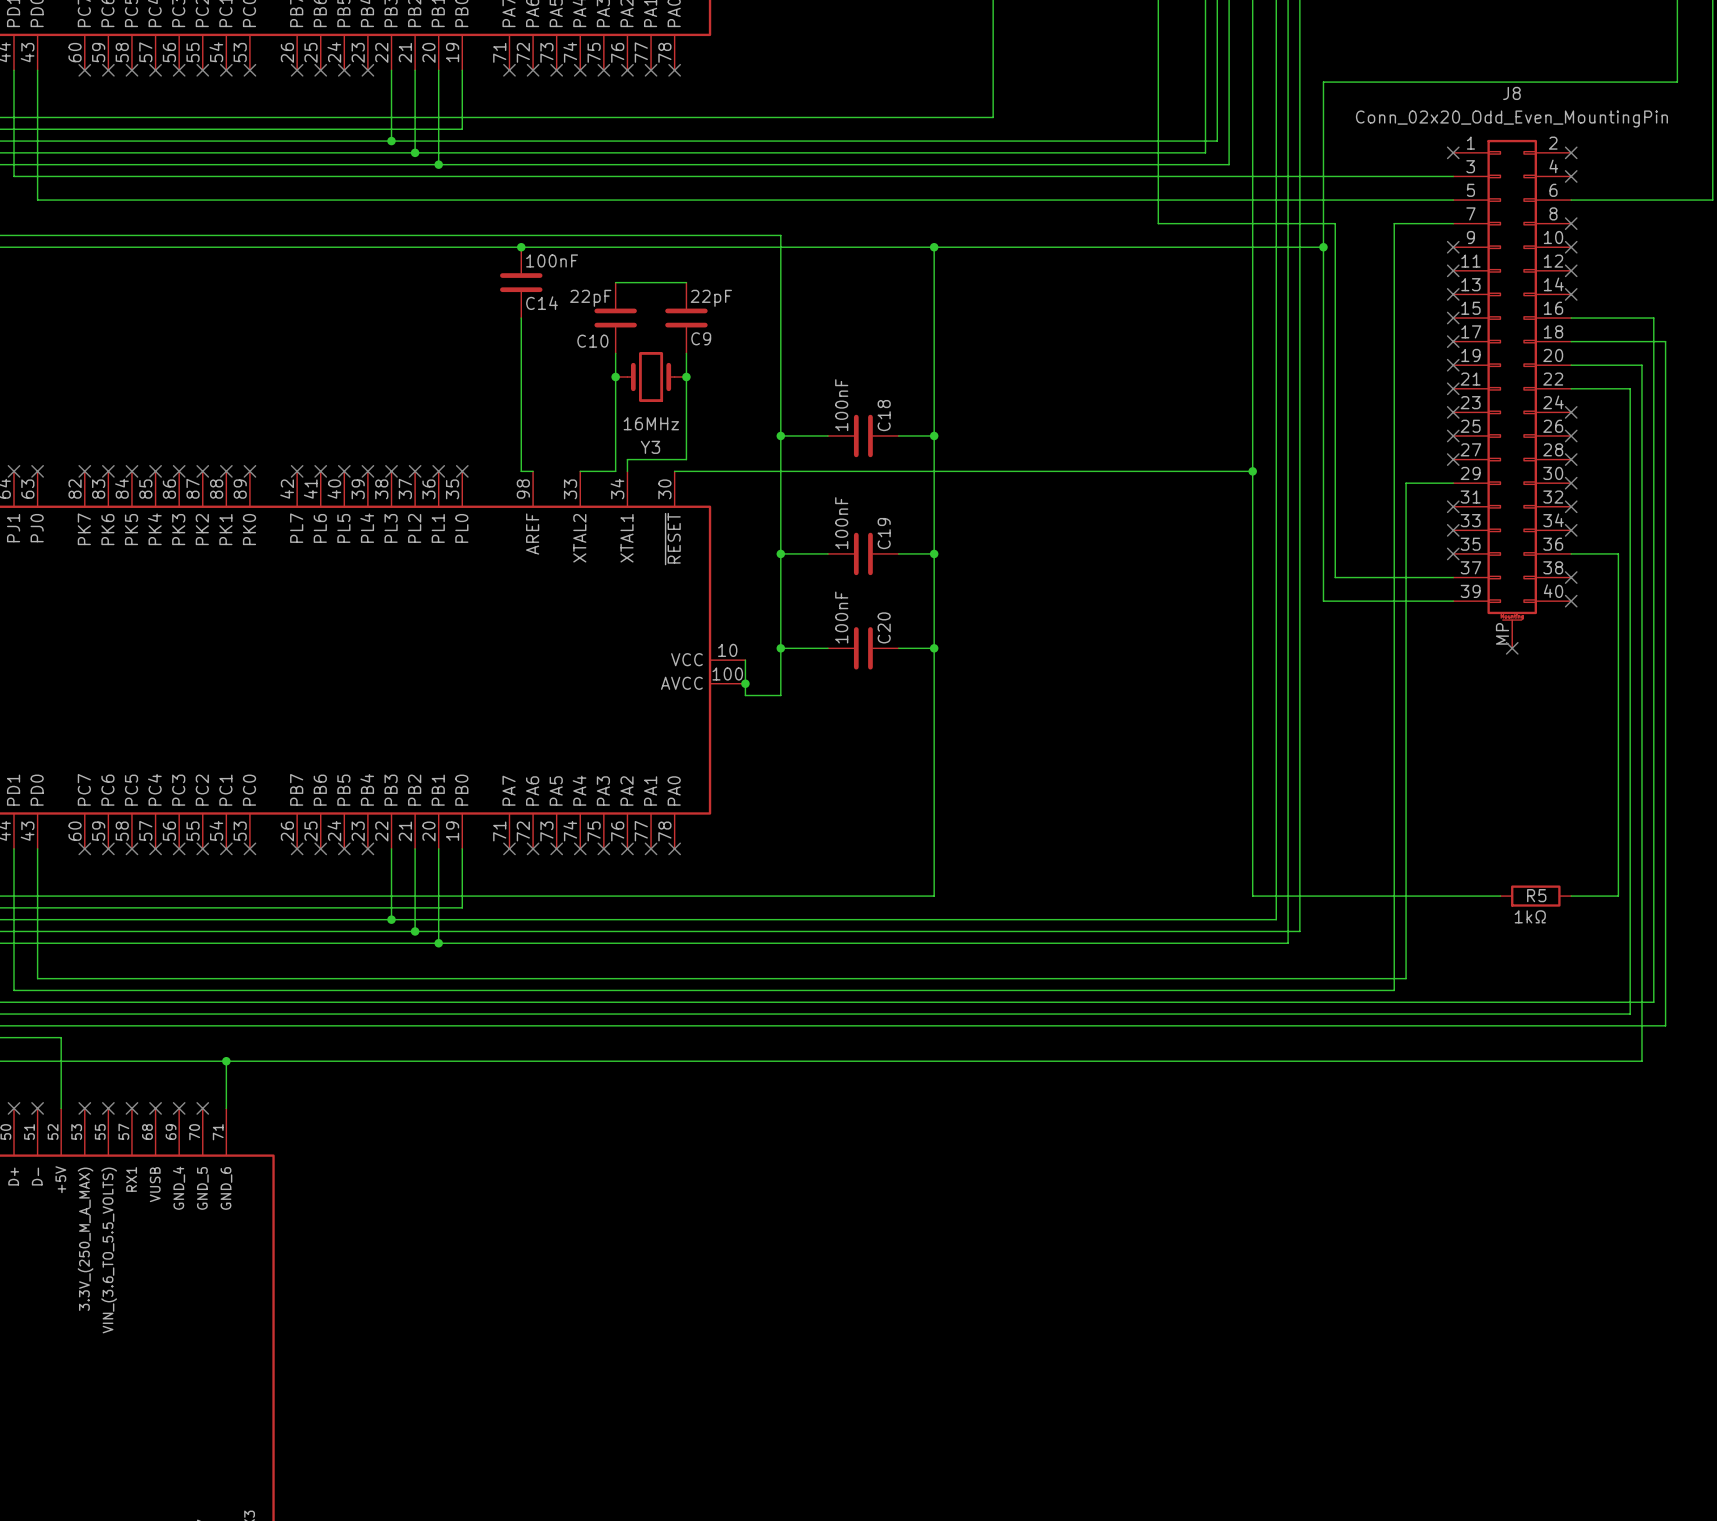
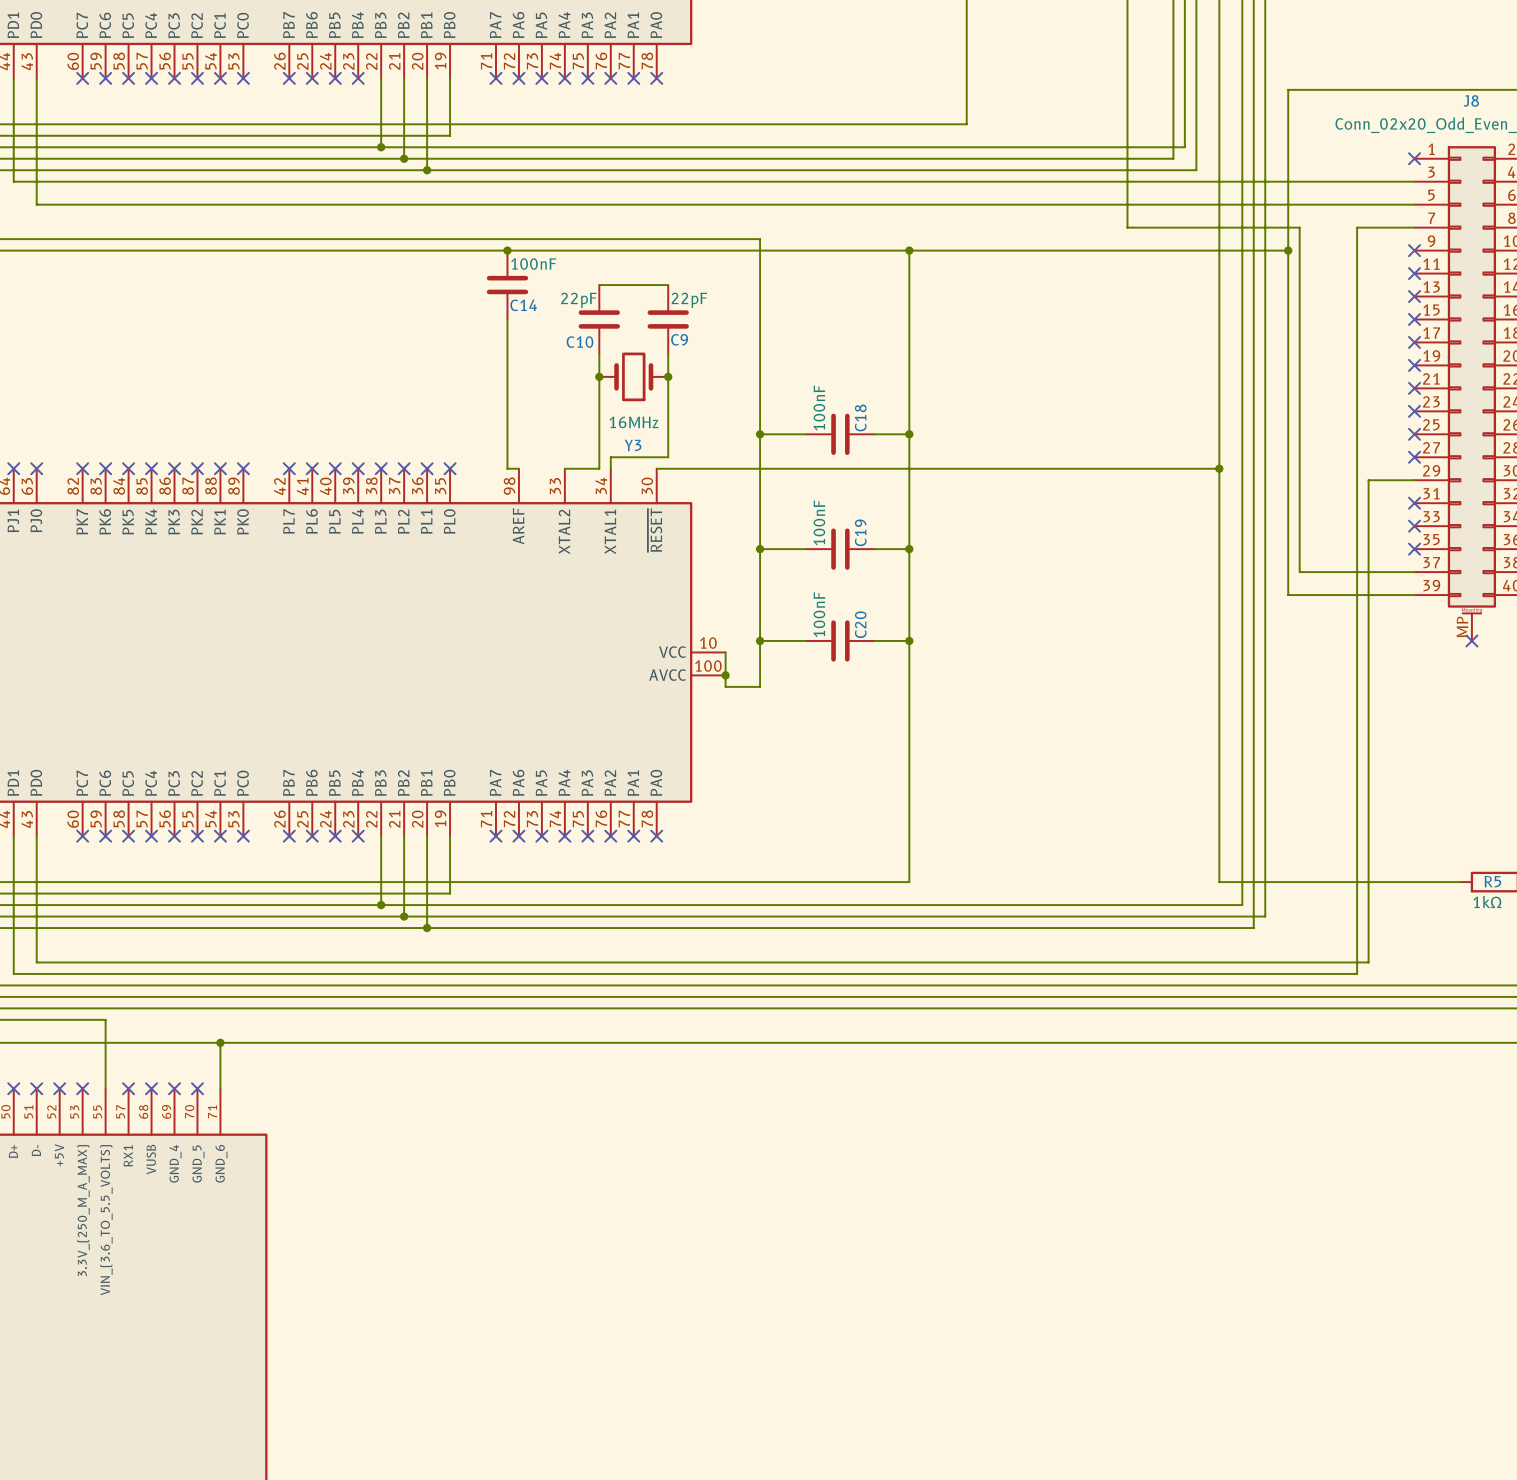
wire: (61, 1037) (61, 1108) -> (59, 1019) (105, 1019) (105, 1088)
no-connect mark position: (108, 1108) -> (59, 1088)

